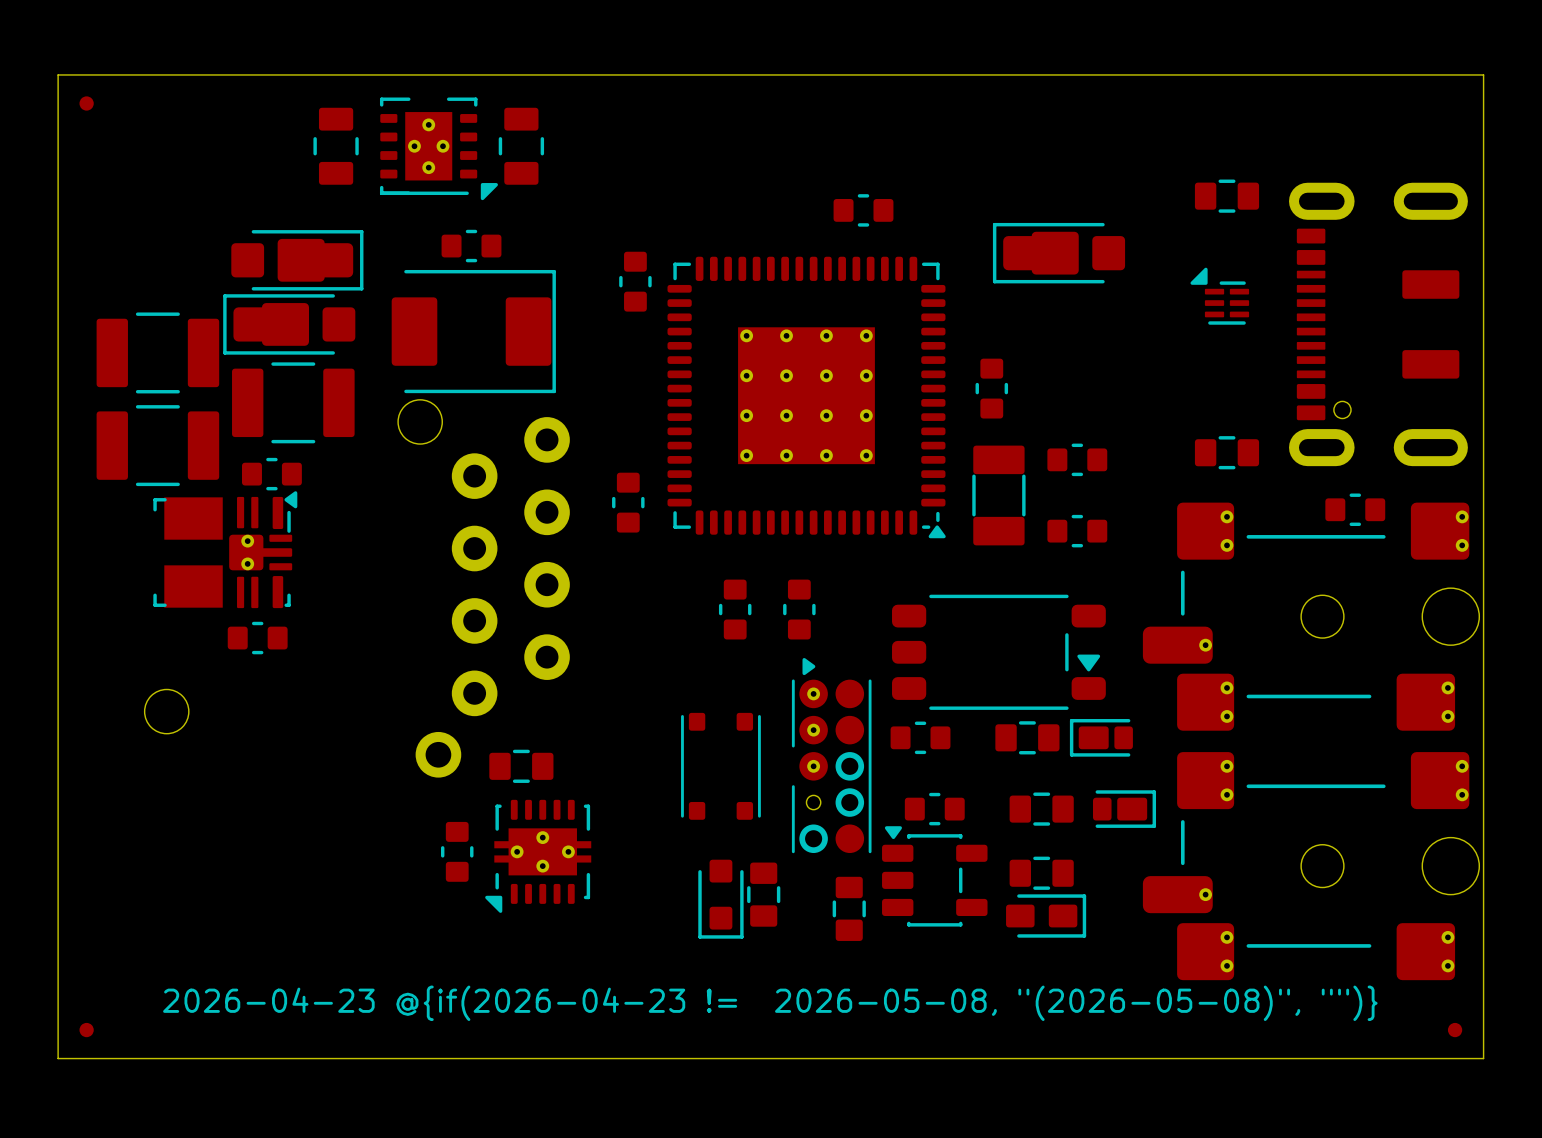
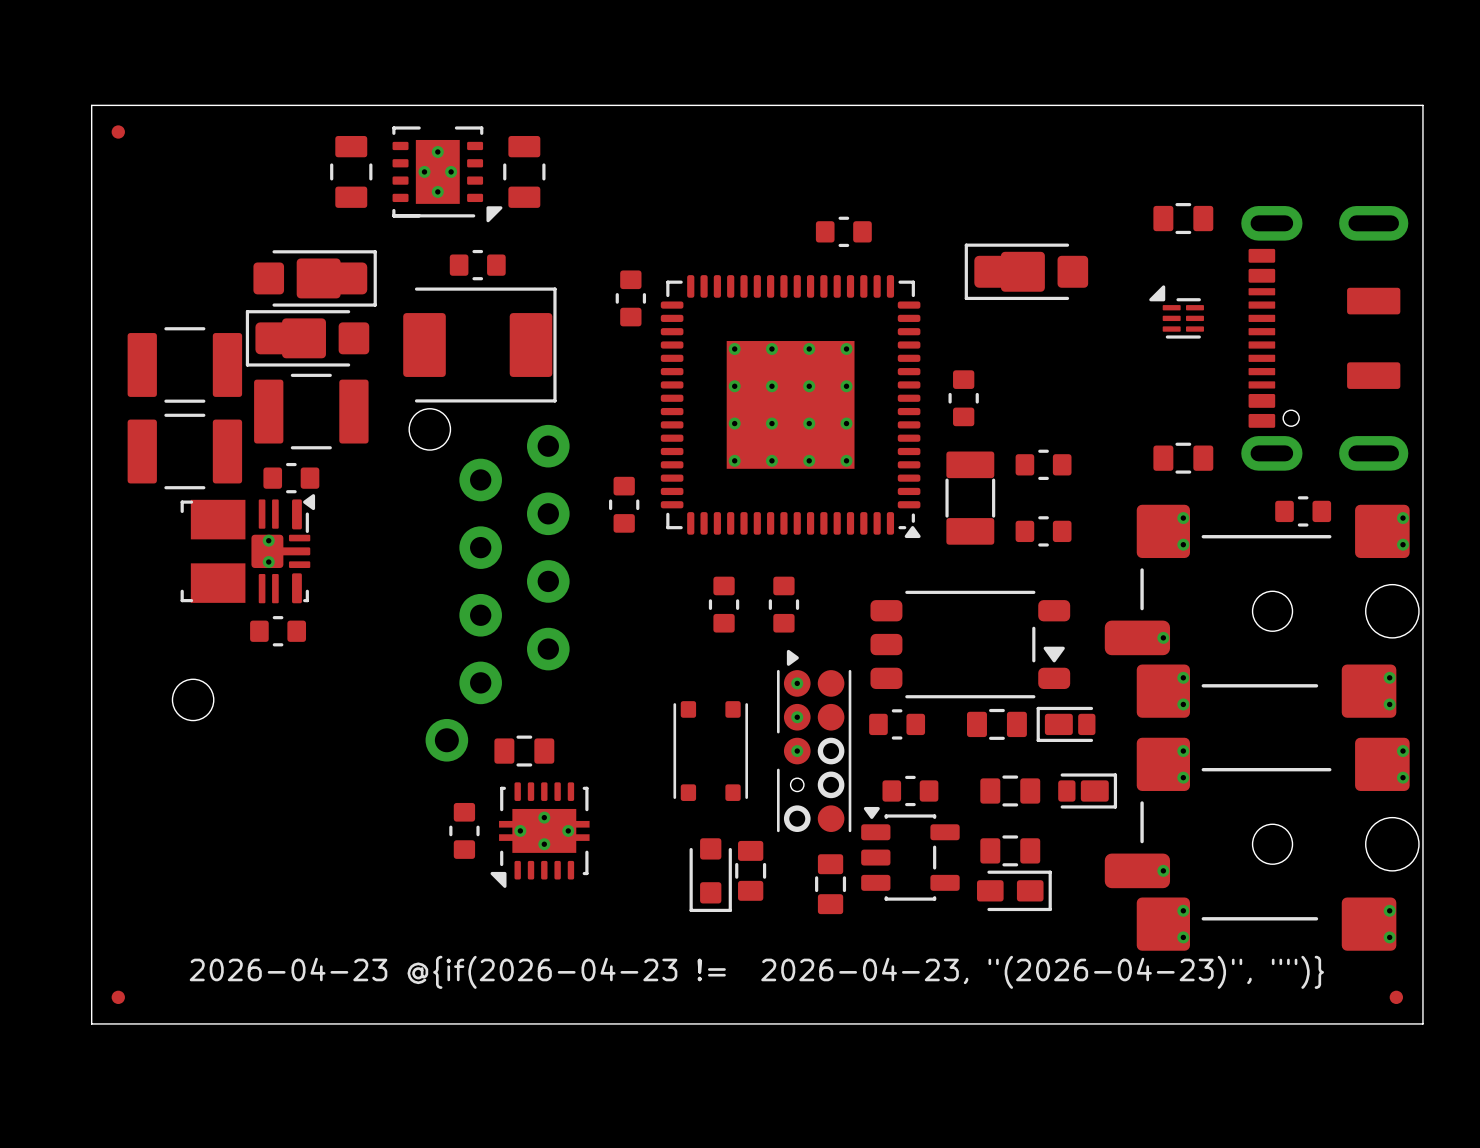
drawing shape: [163, 985, 1378, 1022] -> [189, 955, 1324, 989]

